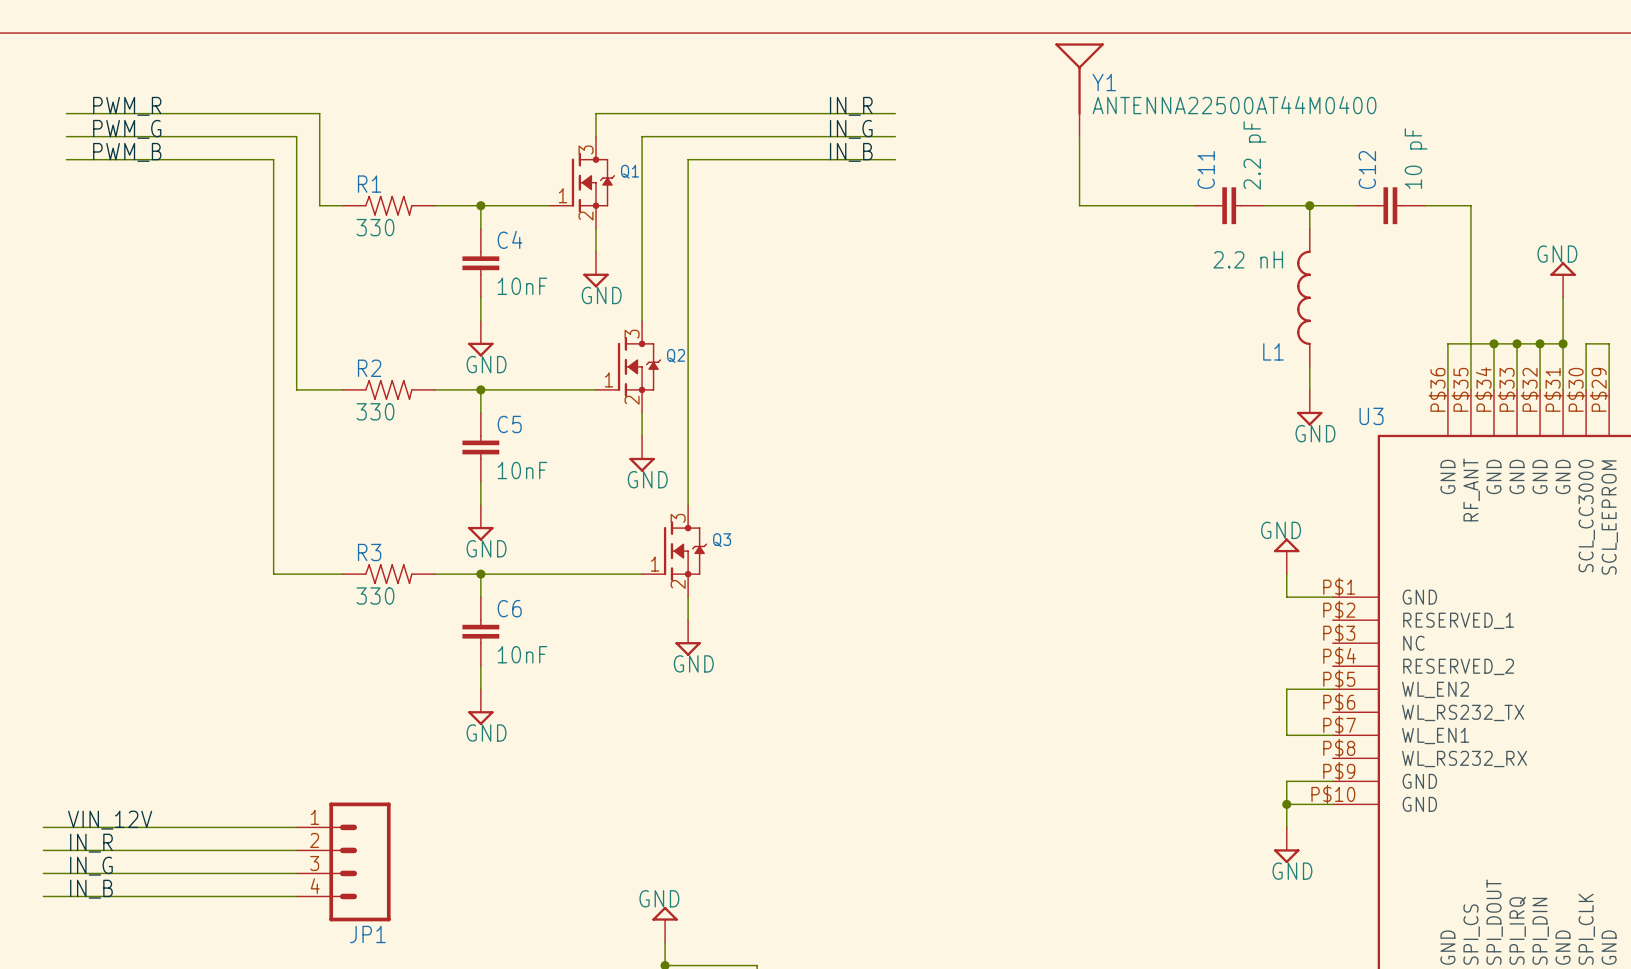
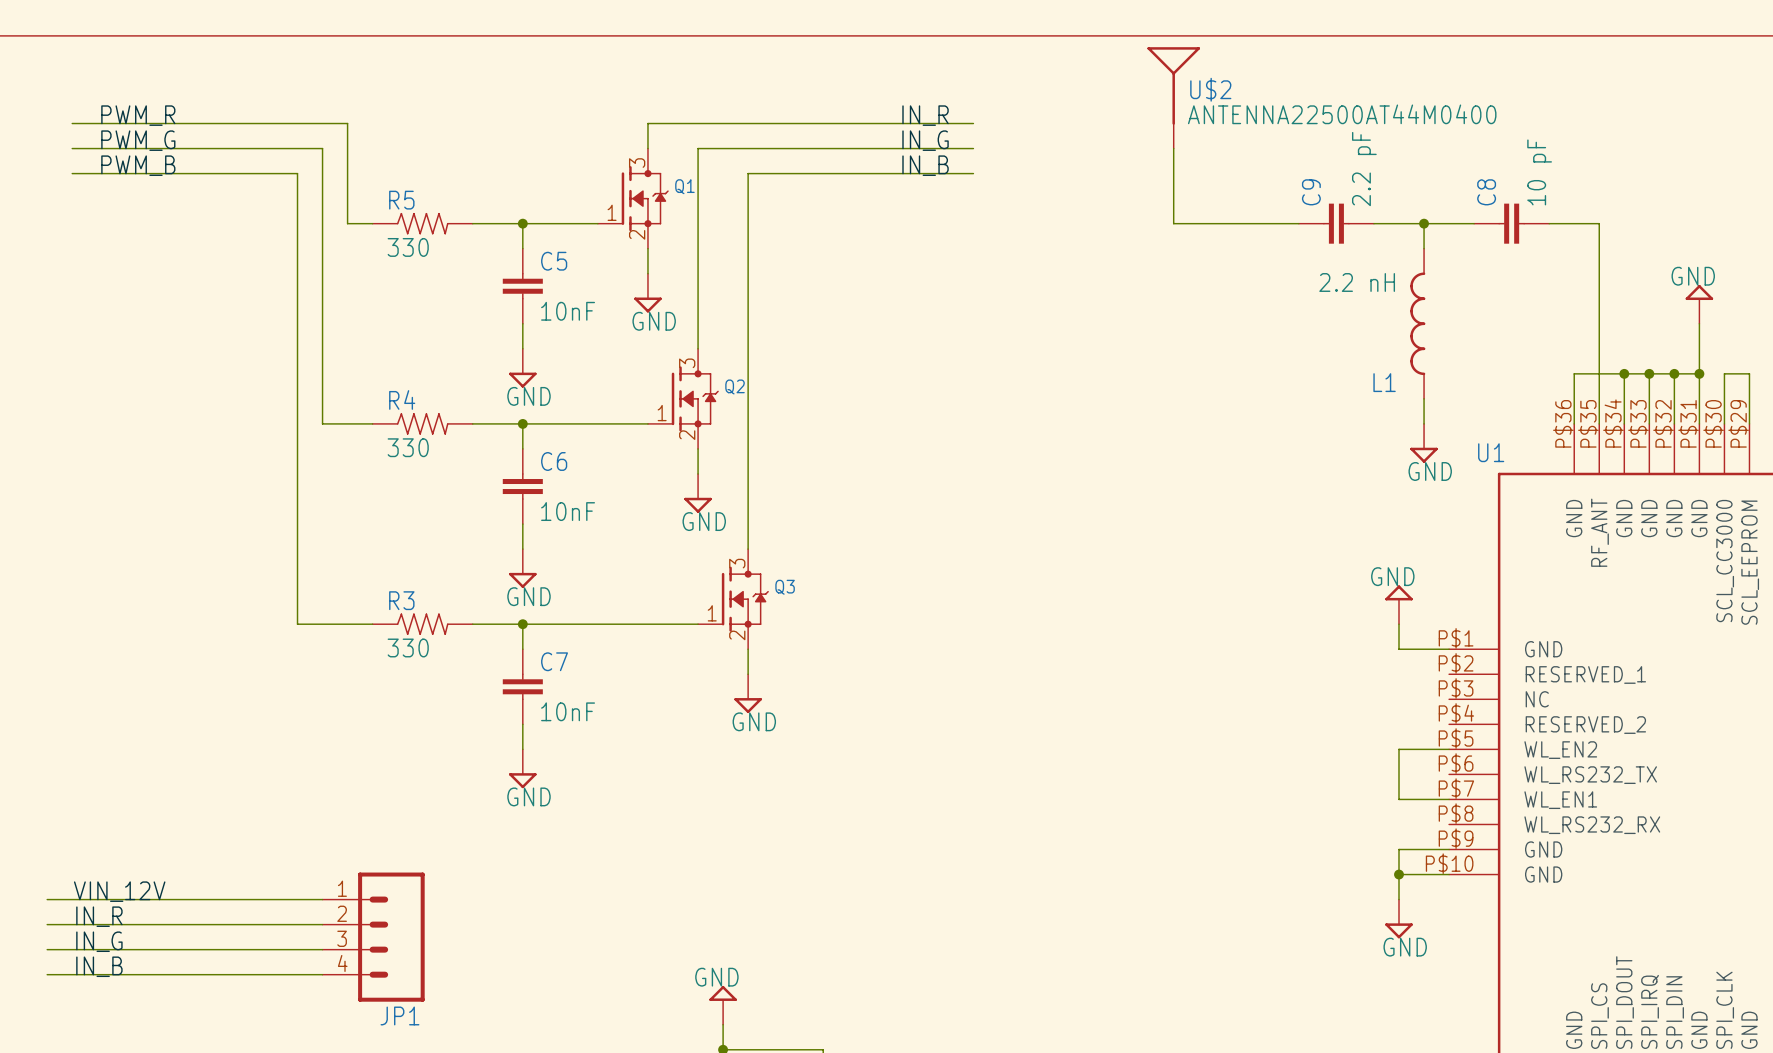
Y1 name: Y1 (1104, 82) -> U$2 (1210, 89)
C11 name: C11 (1206, 169) -> C9 (1311, 192)
C12 name: C12 (1367, 169) -> C8 (1486, 192)
R1 name: R1 (369, 184) -> R5 (401, 200)
C4 name: C4 (510, 239) -> C5 (554, 261)
R2 name: R2 (369, 368) -> R4 (402, 399)
U3 name: U3 (1371, 416) -> U1 (1491, 452)
C5 name: C5 (509, 424) -> C6 (554, 461)
C6 name: C6 (509, 608) -> C7 (554, 661)

